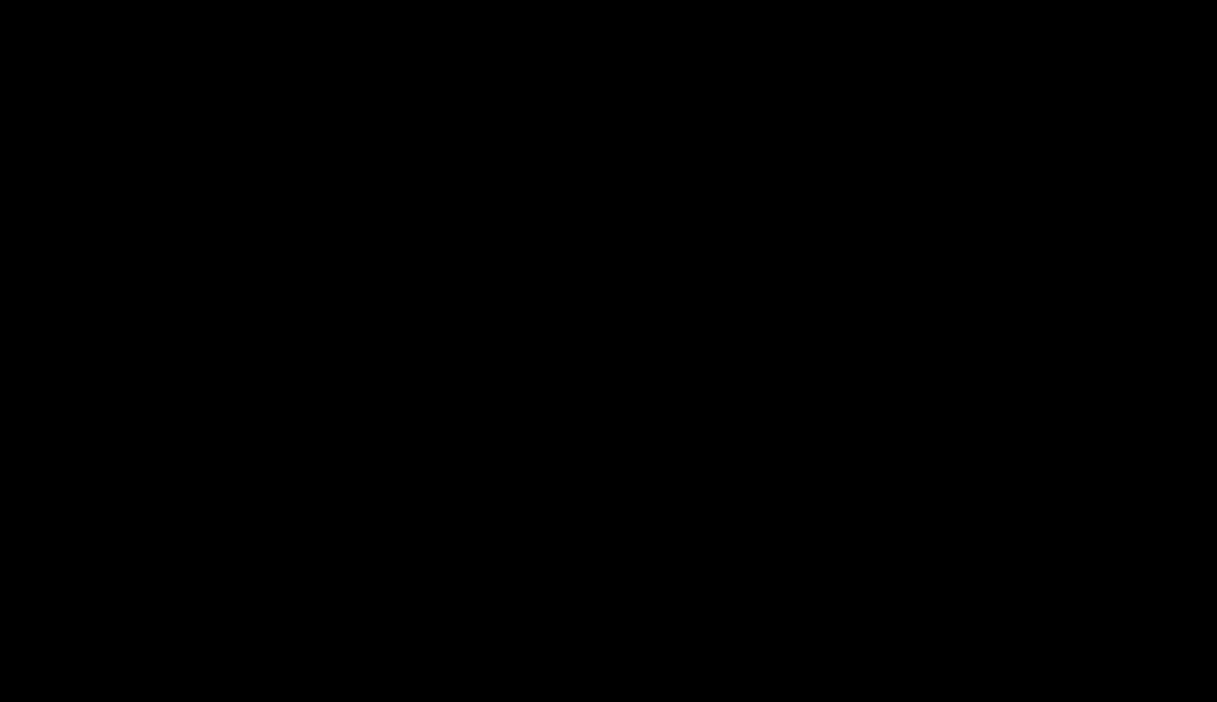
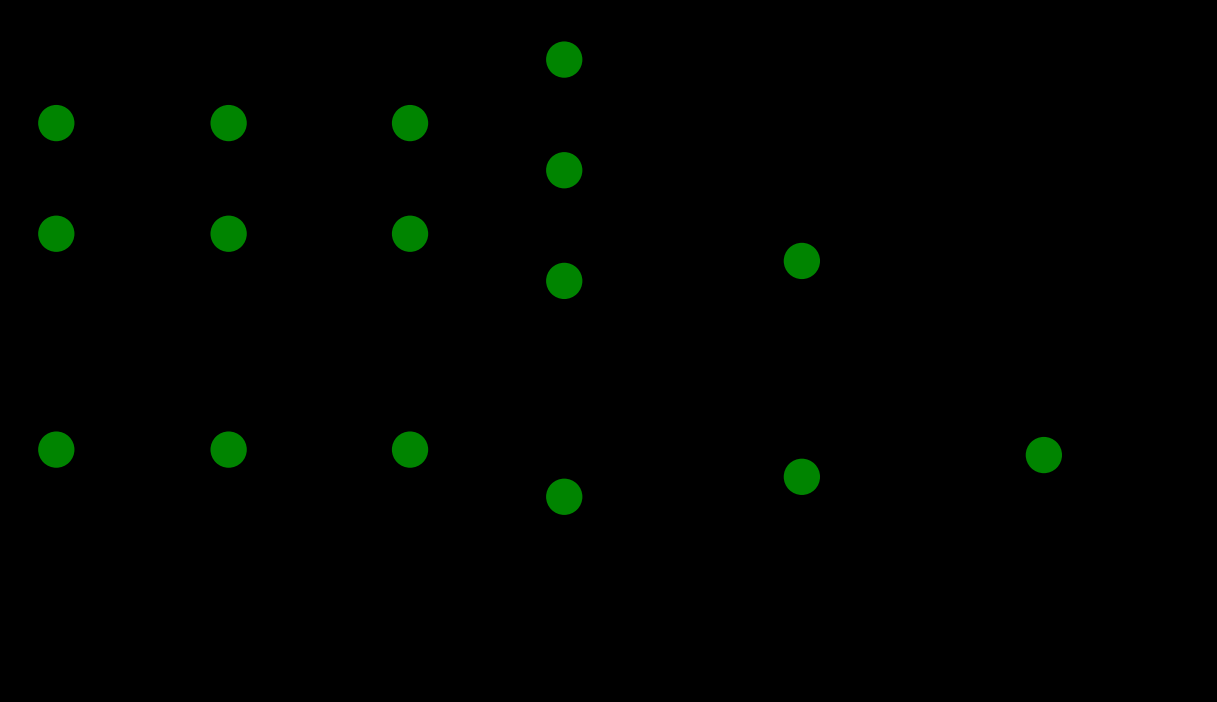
part: none -> (564, 59)
part: none -> (56, 123)
part: none -> (228, 123)
part: none -> (410, 123)
part: none -> (564, 170)
part: none -> (56, 233)
part: none -> (228, 233)
part: none -> (410, 233)
part: none -> (801, 260)
part: none -> (564, 280)
part: none -> (56, 449)
part: none -> (228, 449)
part: none -> (410, 449)
part: none -> (1043, 455)
part: none -> (801, 476)
part: none -> (564, 496)

